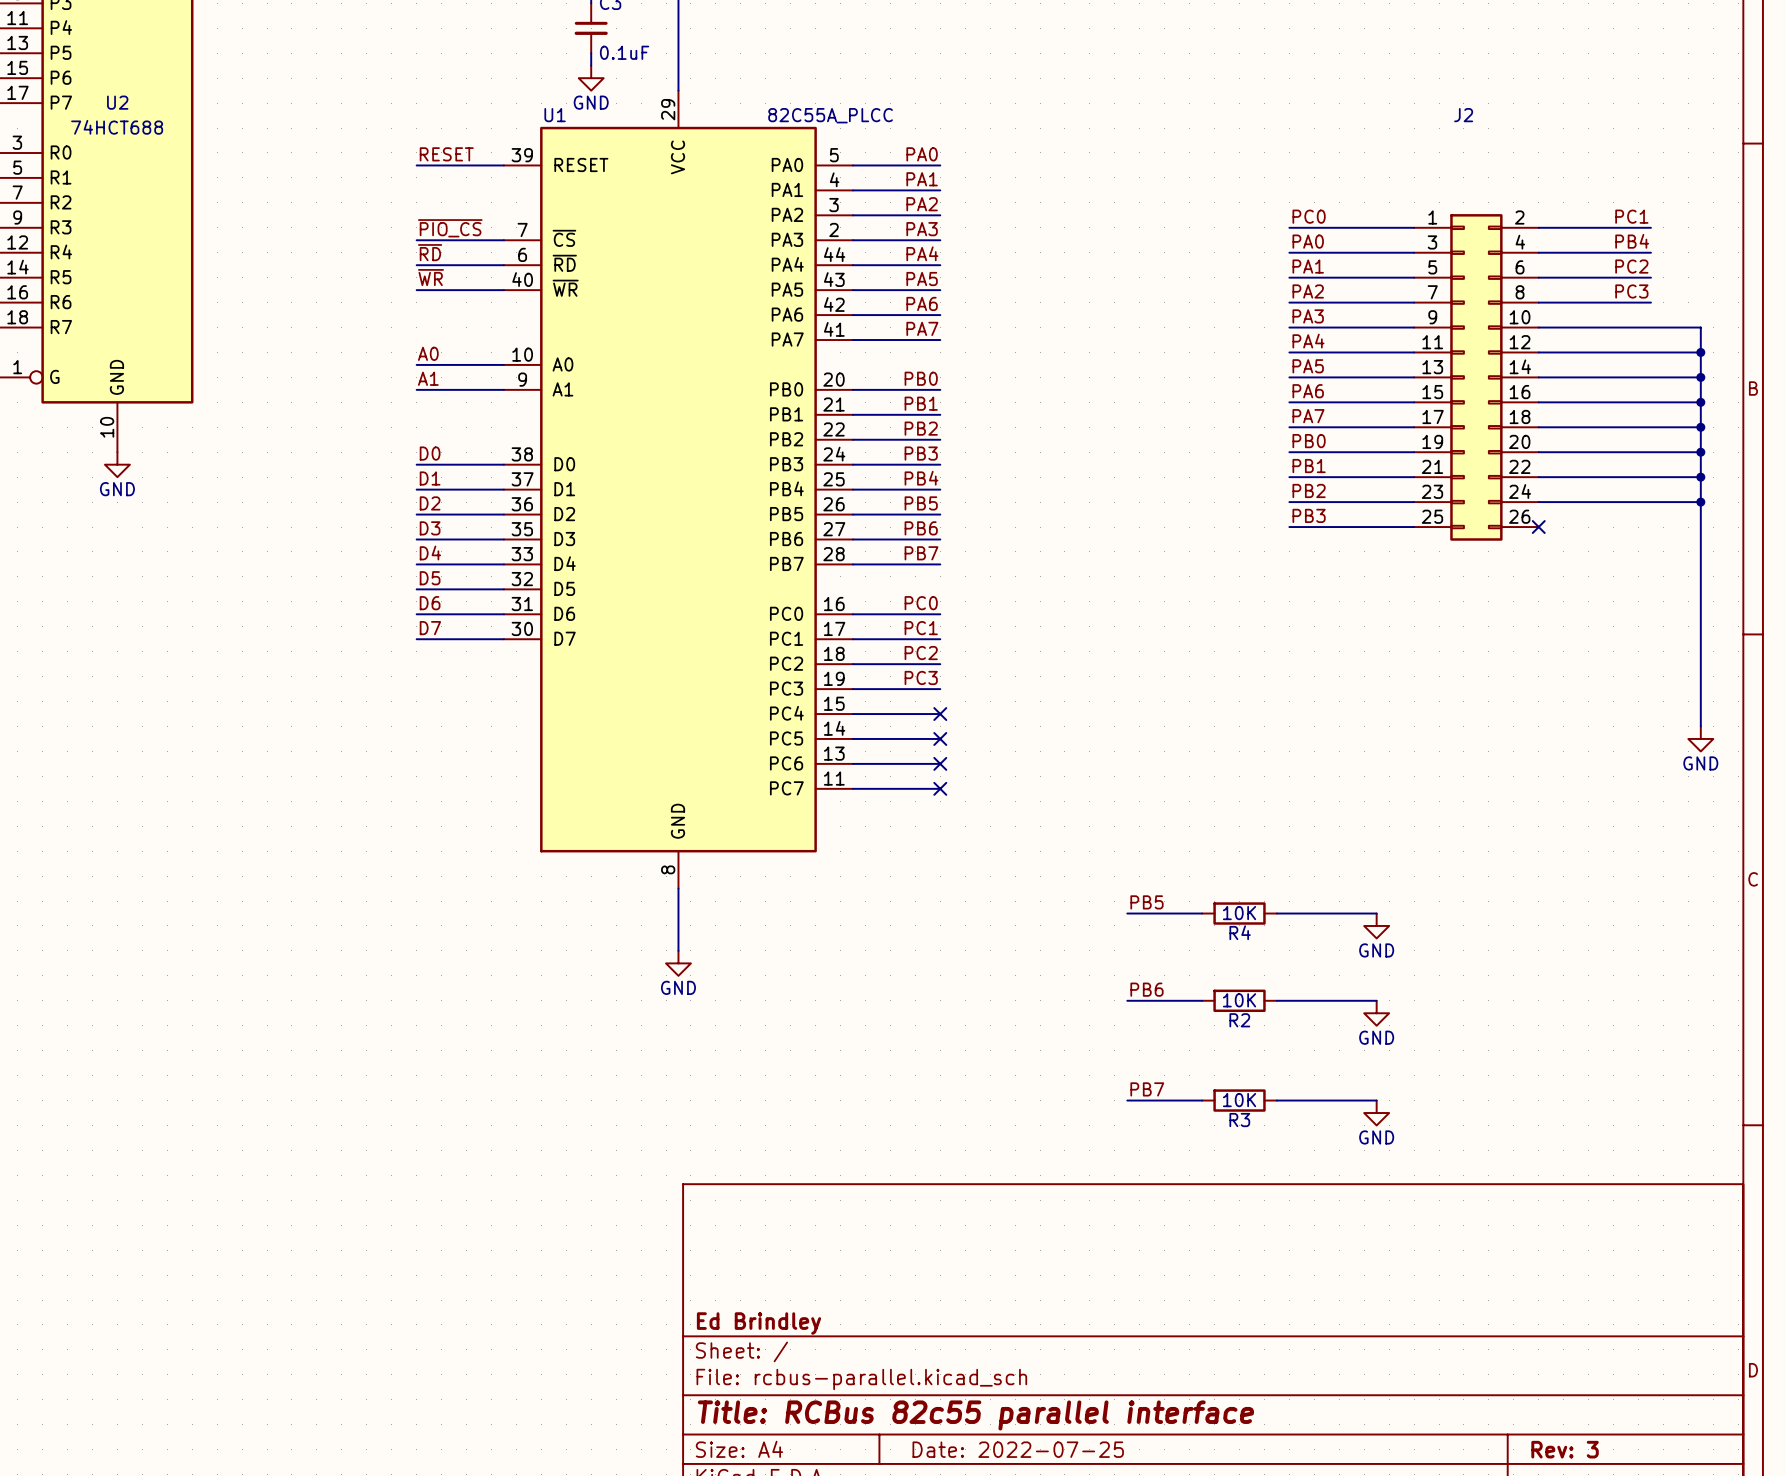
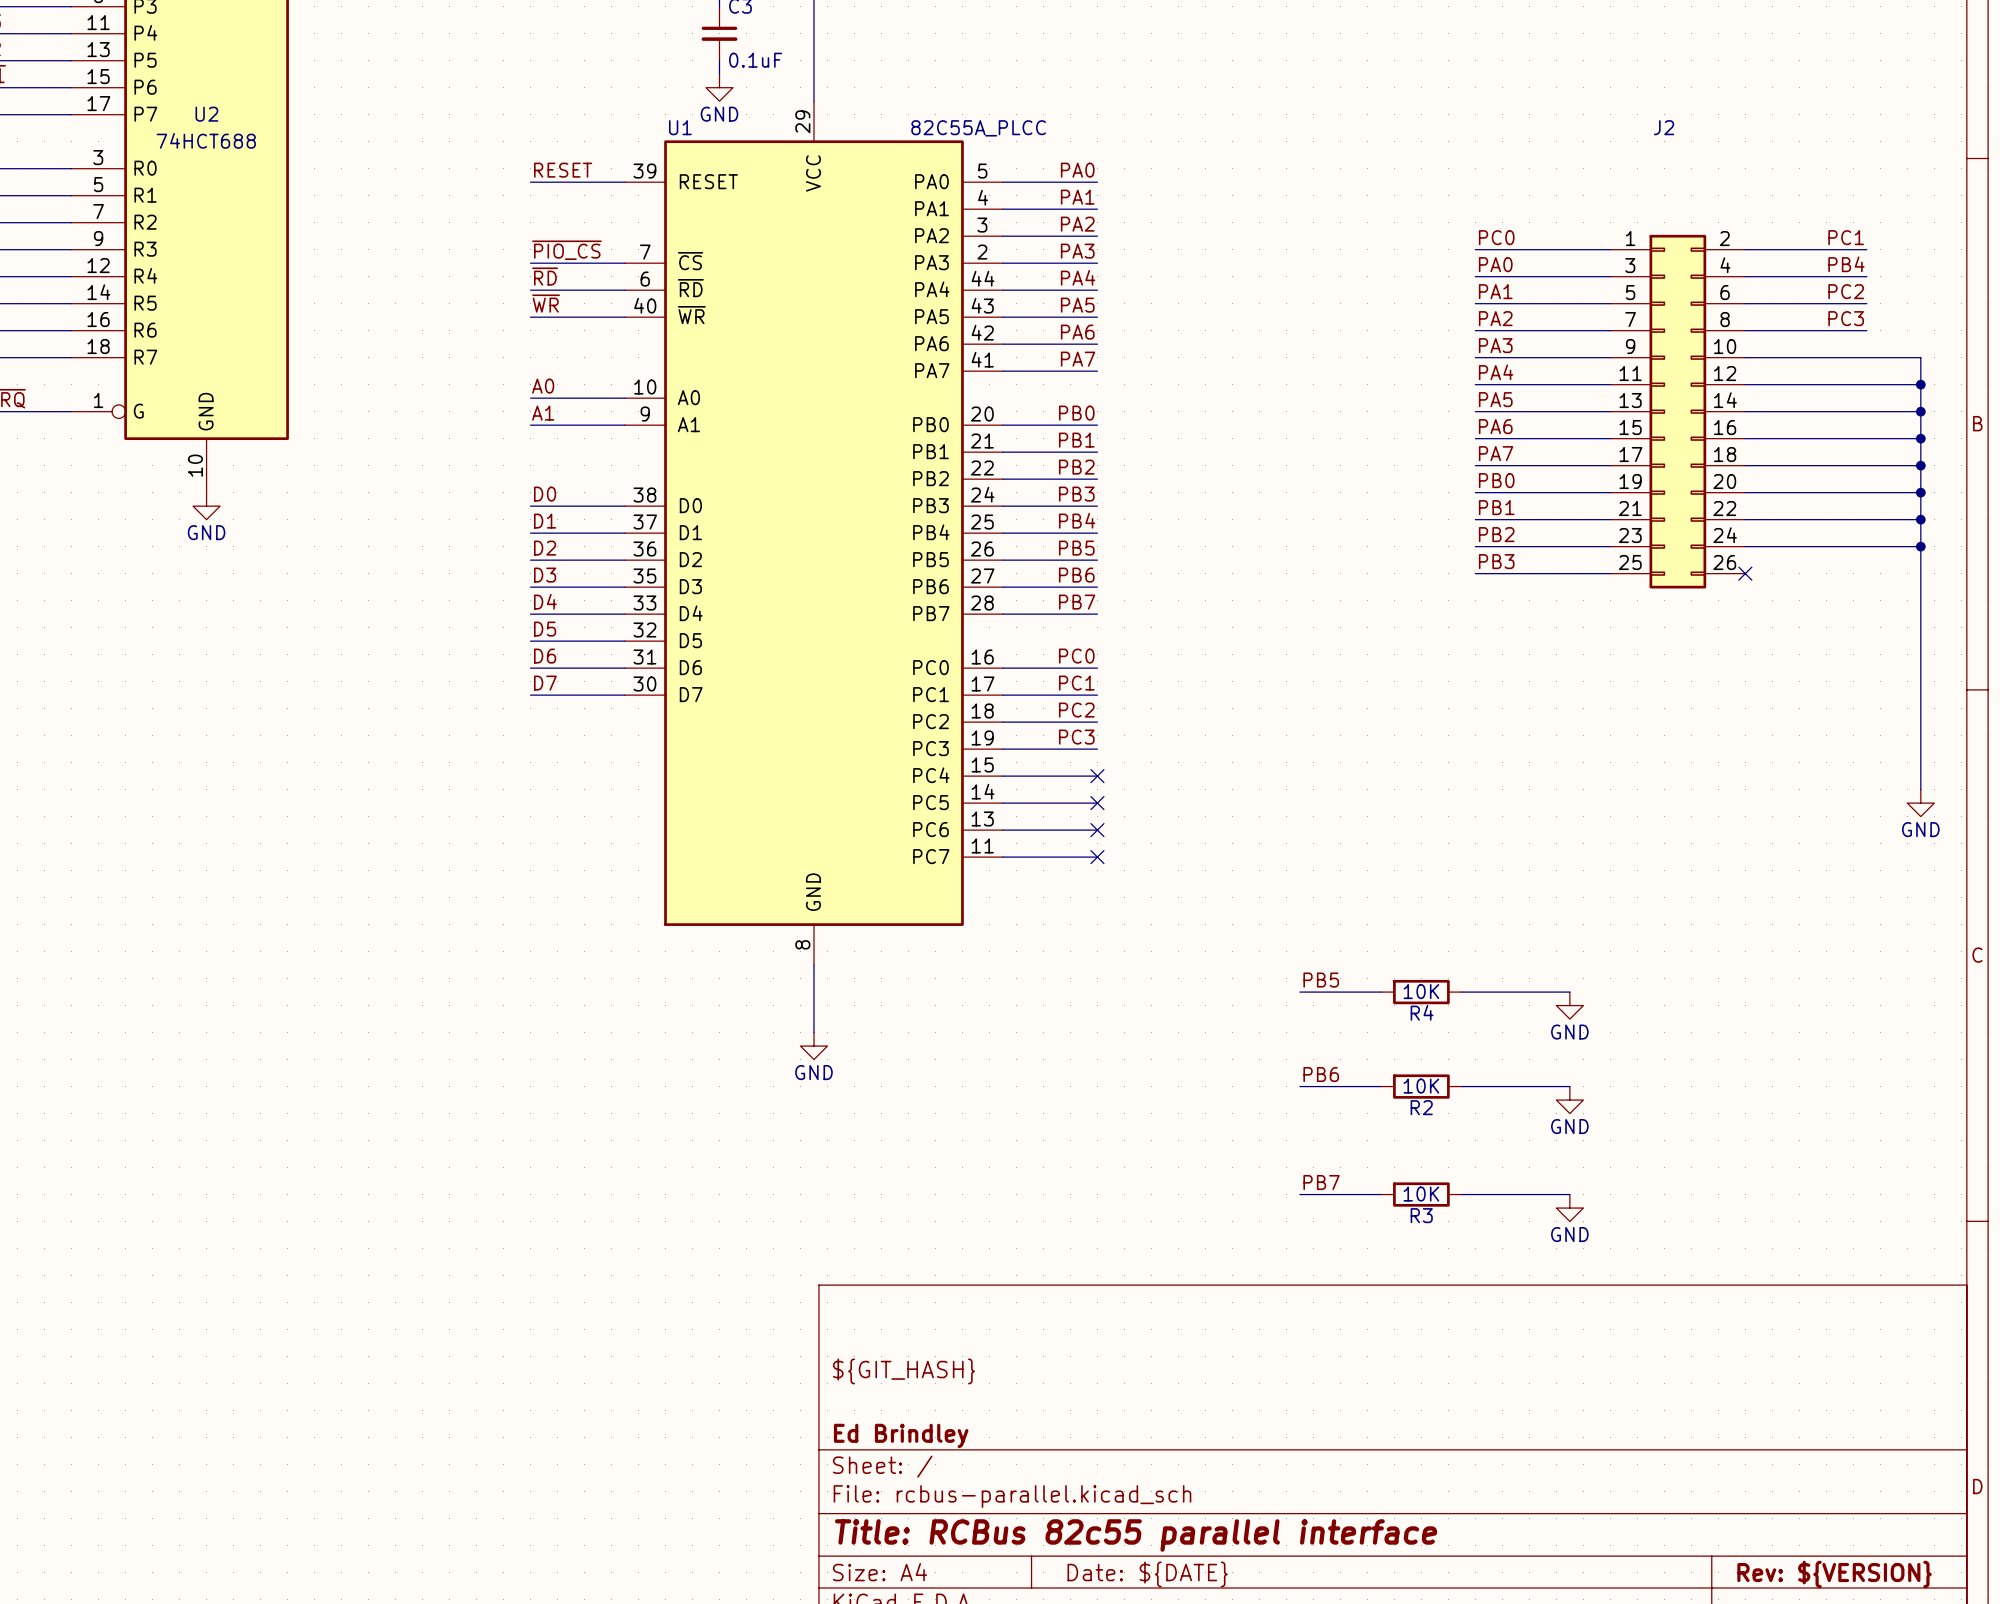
title block: none -> ${GIT_HASH} (903, 1371)
title block: Date: 2022-07-25 (1018, 1449) -> Date: ${DATE} (1147, 1574)
title block: Rev: 3 (1565, 1449) -> Rev: ${VERSION} (1834, 1574)

